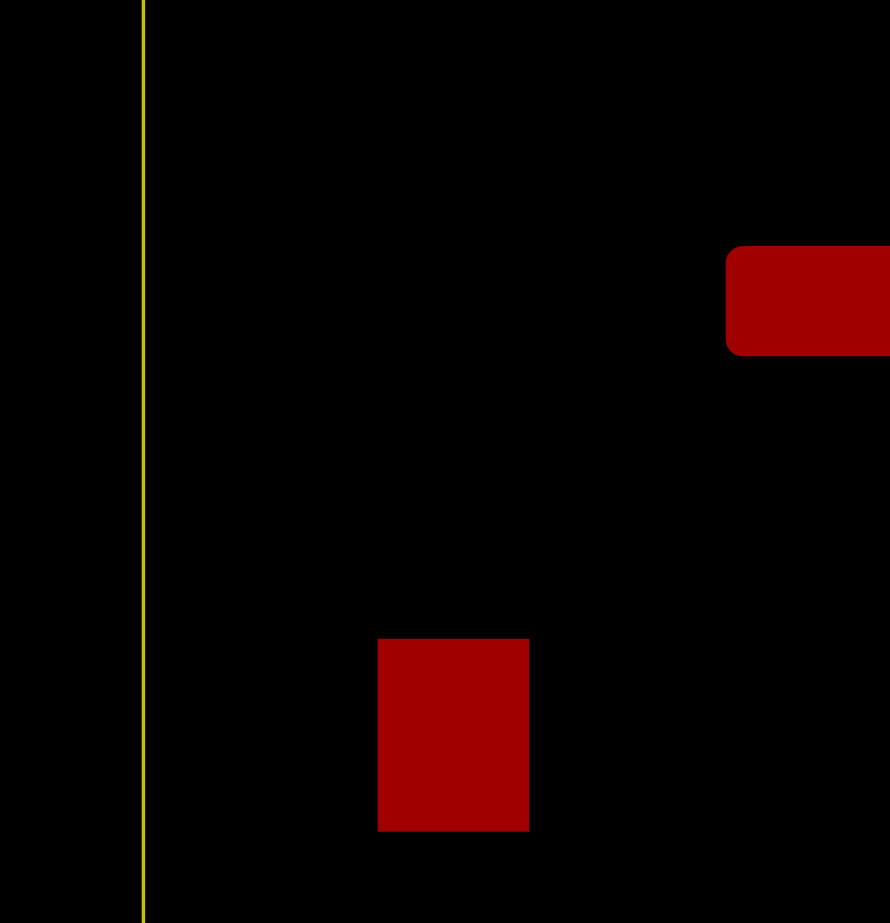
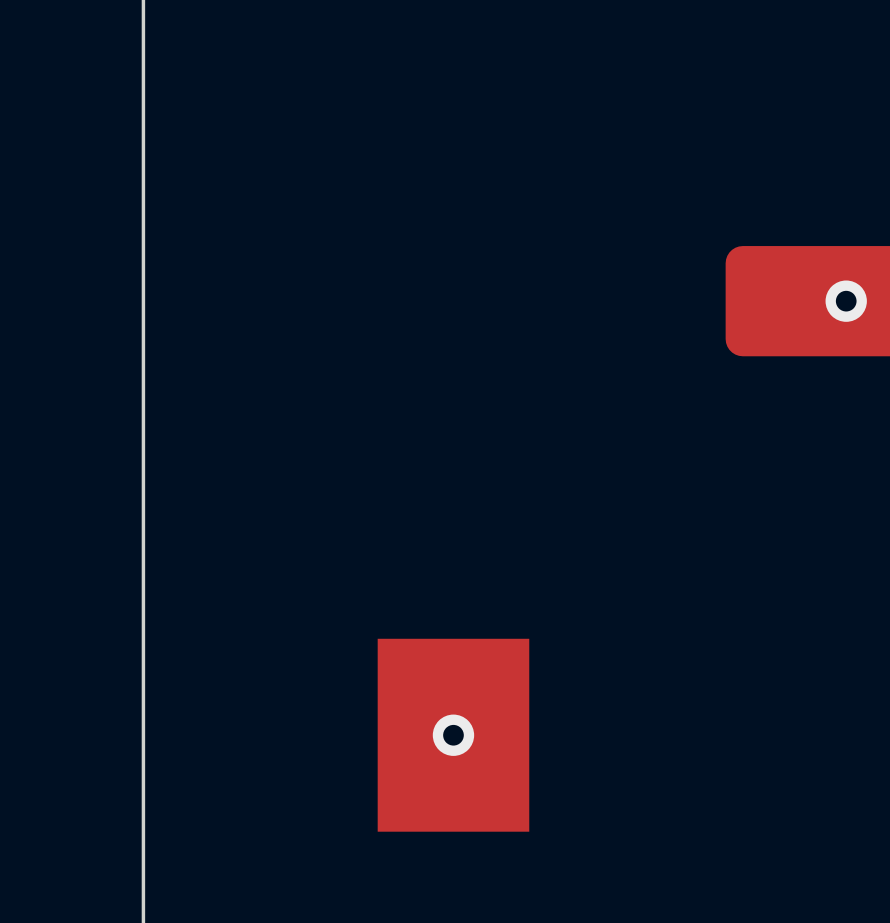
via: none -> (846, 301)
via: none -> (453, 735)

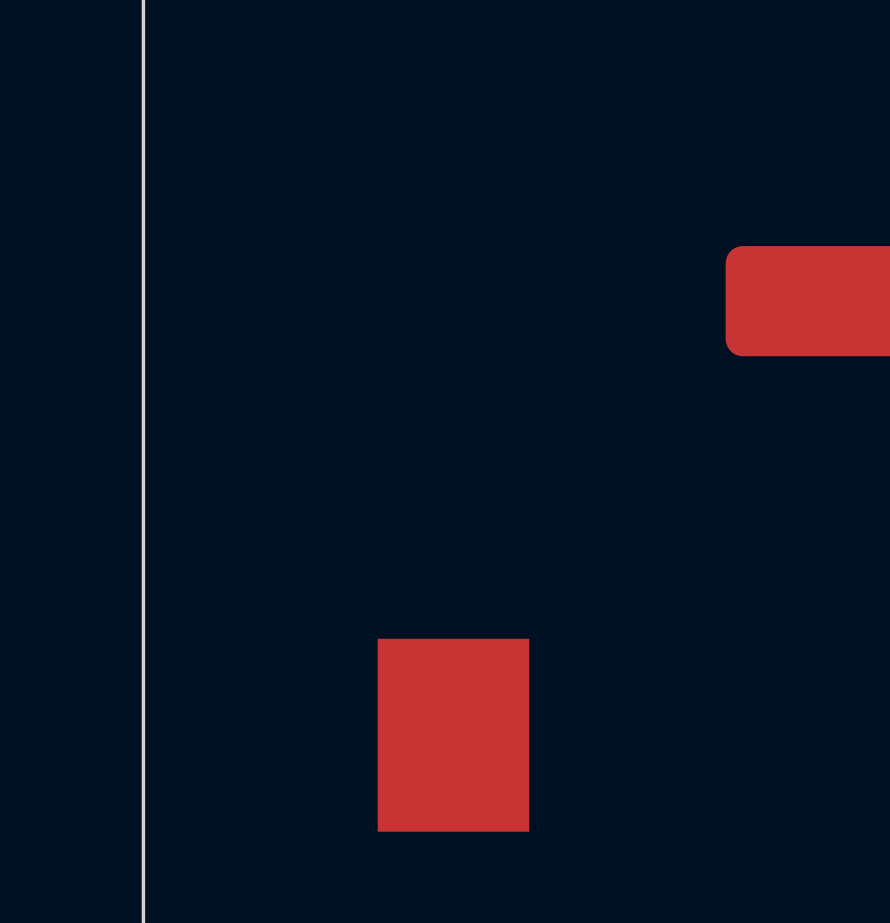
via: (846, 301) -> none
via: (453, 735) -> none

